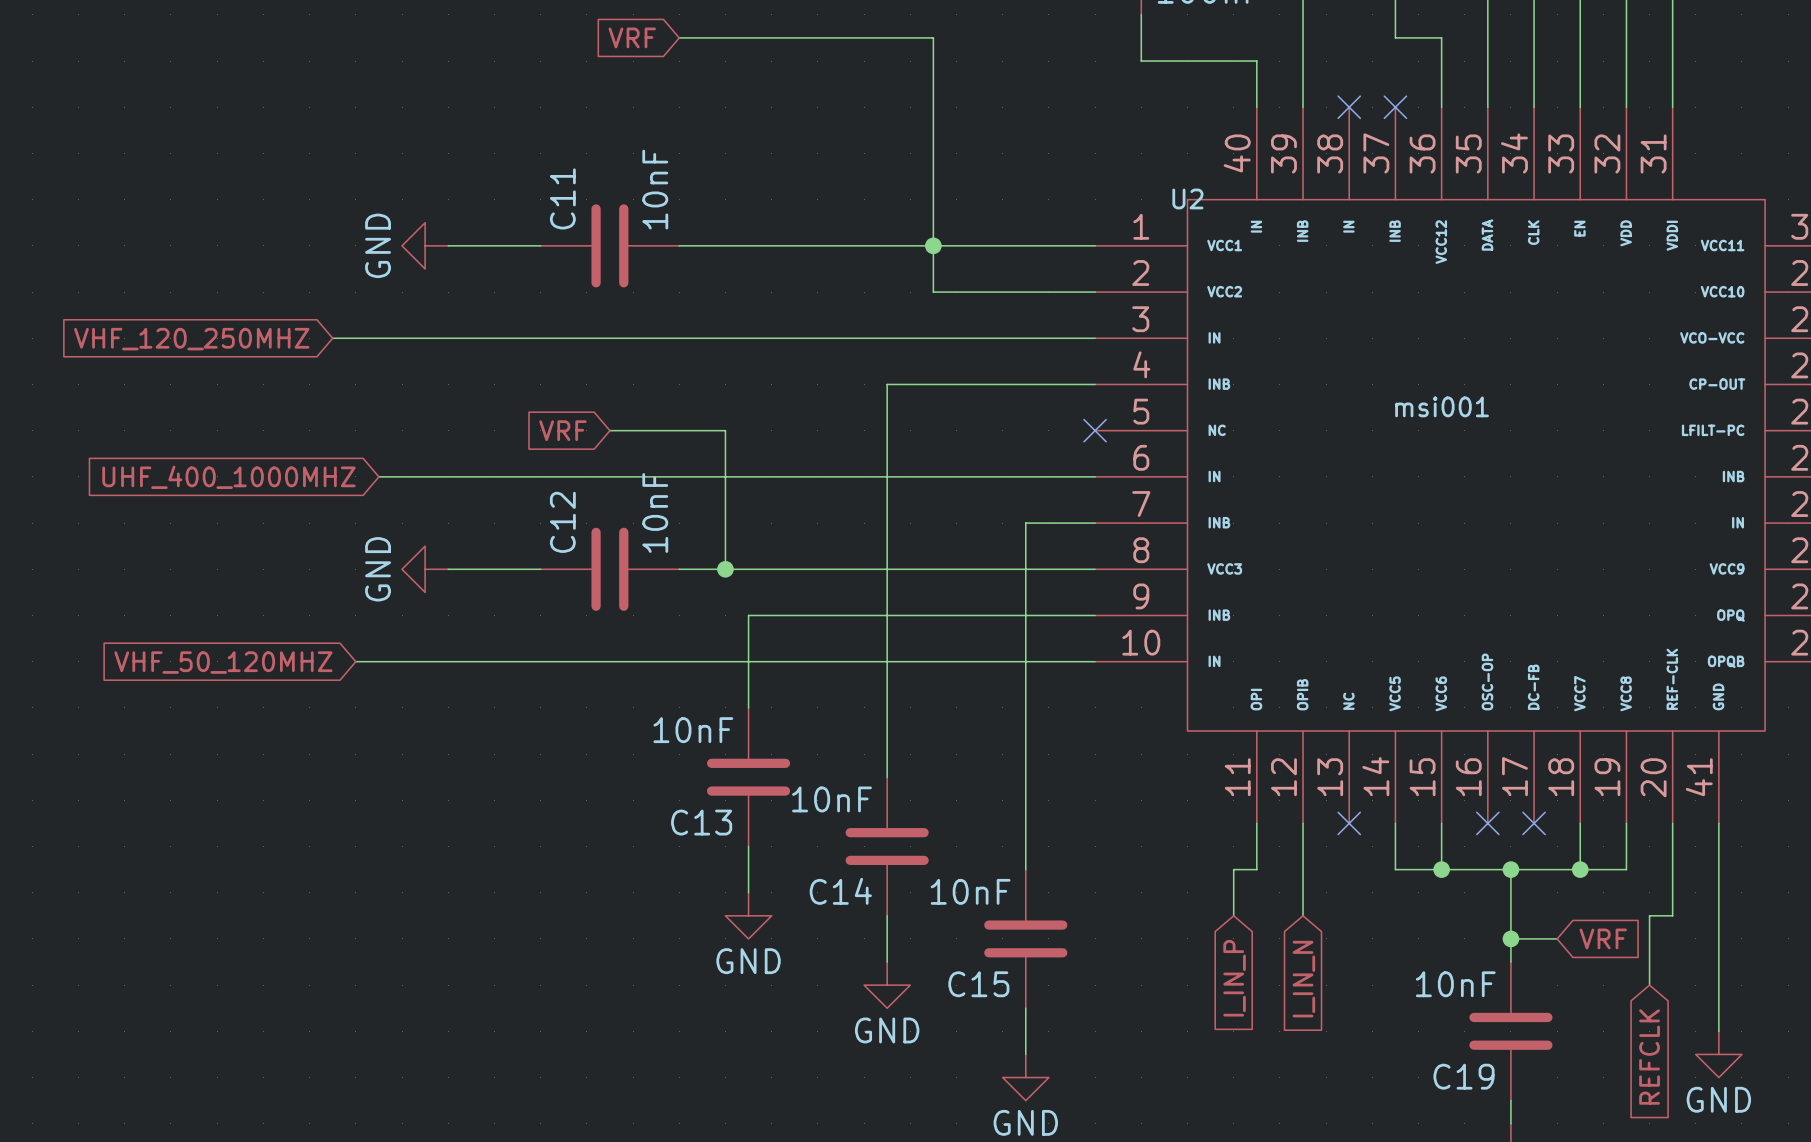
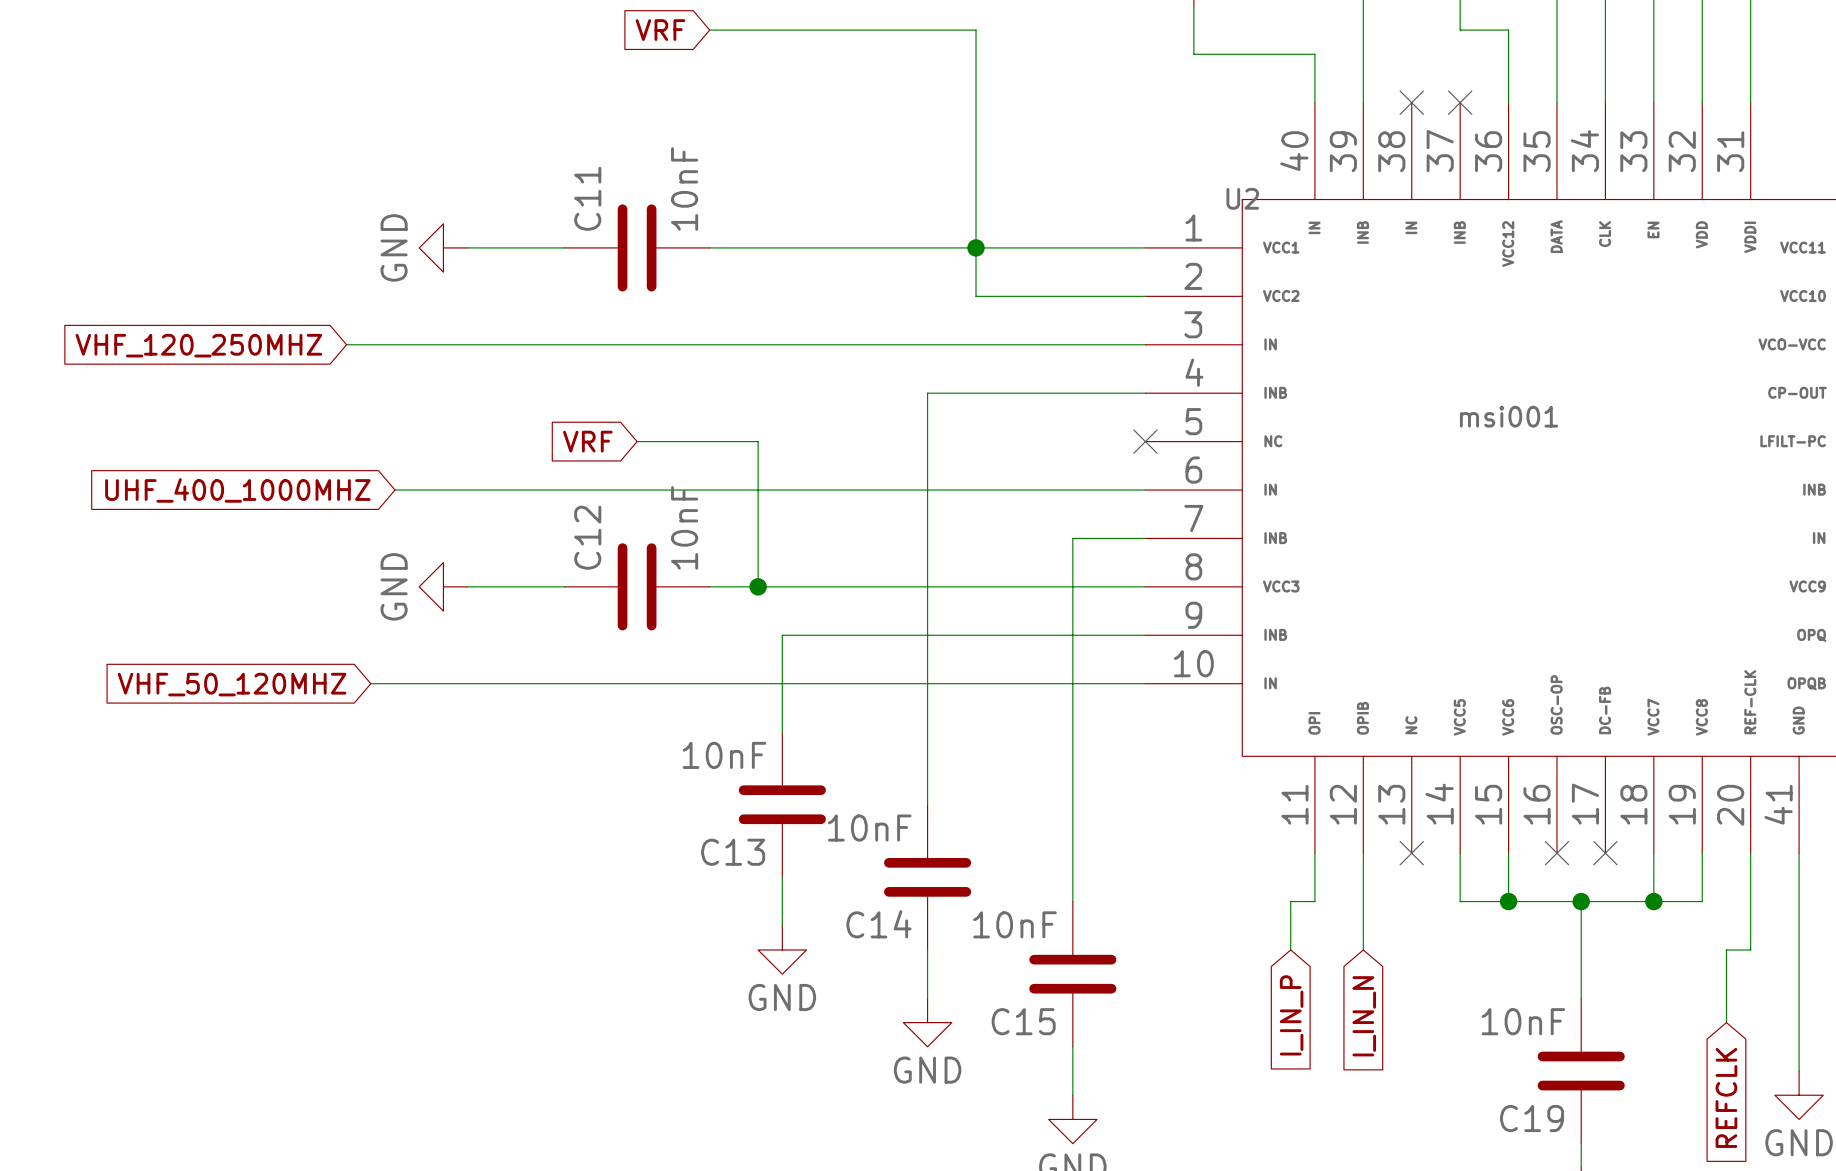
wire: (1510, 938) (1557, 938) -> none
junction: (1510, 938) -> none
global label: VRF (1603, 938) -> none

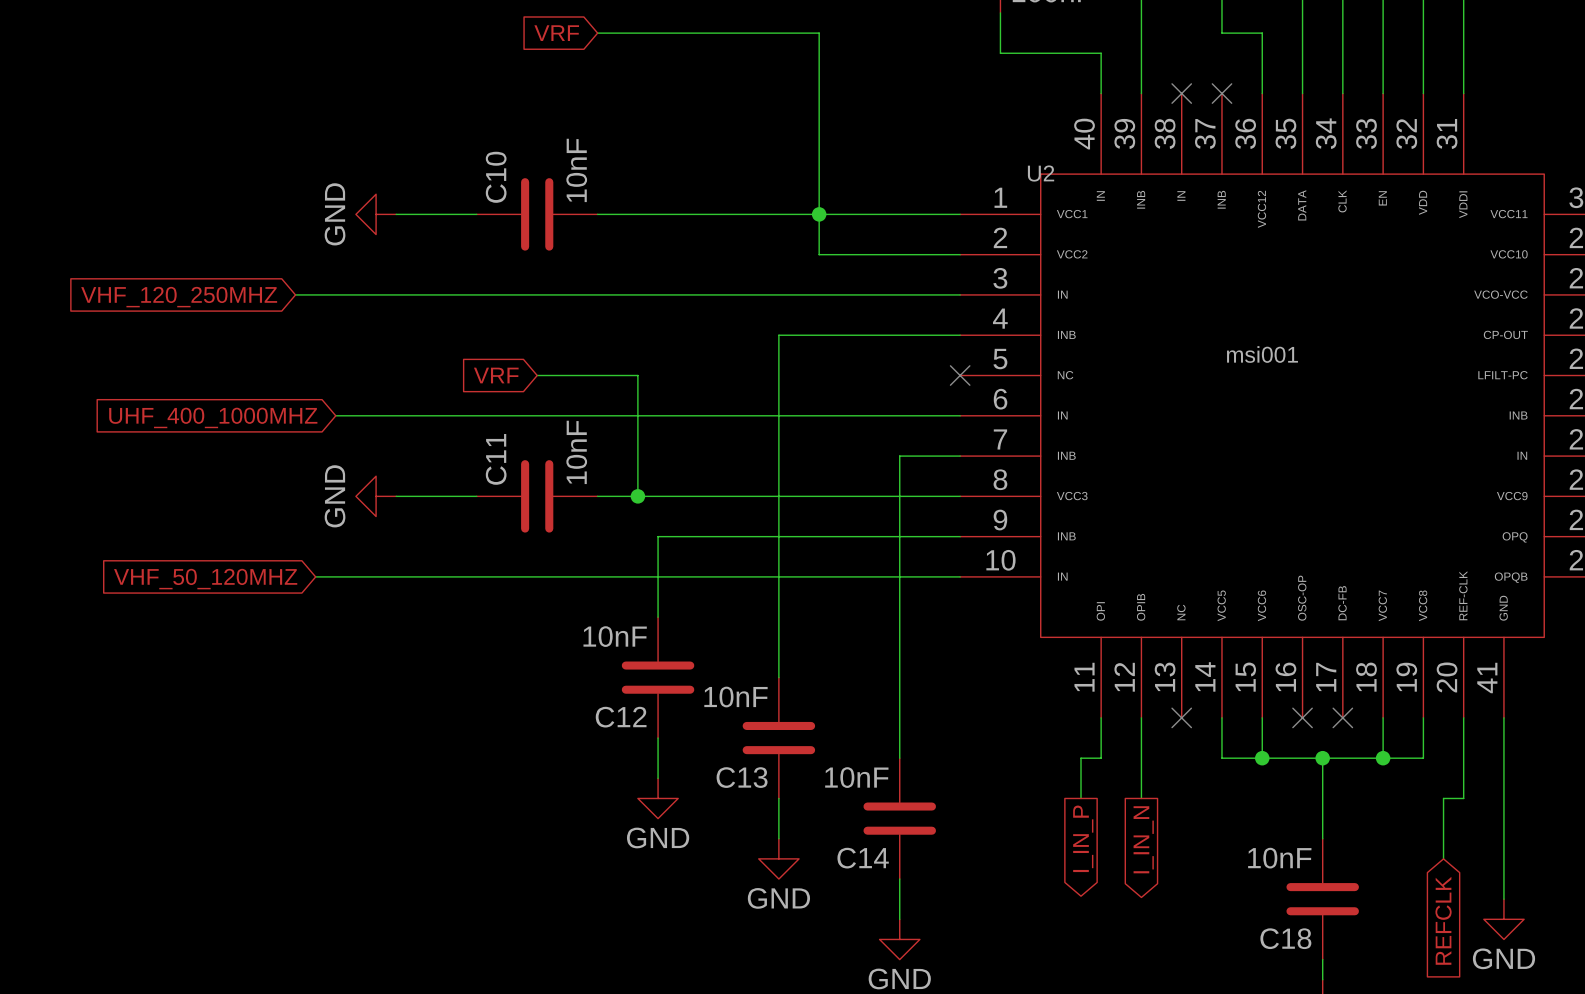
C11 name: C11 (587, 198) -> C10 (496, 177)
C12 name: C12 (587, 537) -> C11 (496, 459)
C13 name: C13 (733, 852) -> C12 (621, 717)
C14 name: C14 (878, 924) -> C13 (742, 777)
global label shape: input (1291, 1015) -> output (1083, 838)
global label shape: input (1364, 1016) -> output (1143, 839)
C15 name: C15 (1023, 1021) -> C14 (863, 858)
C19 name: C19 (1532, 1118) -> C18 (1285, 938)

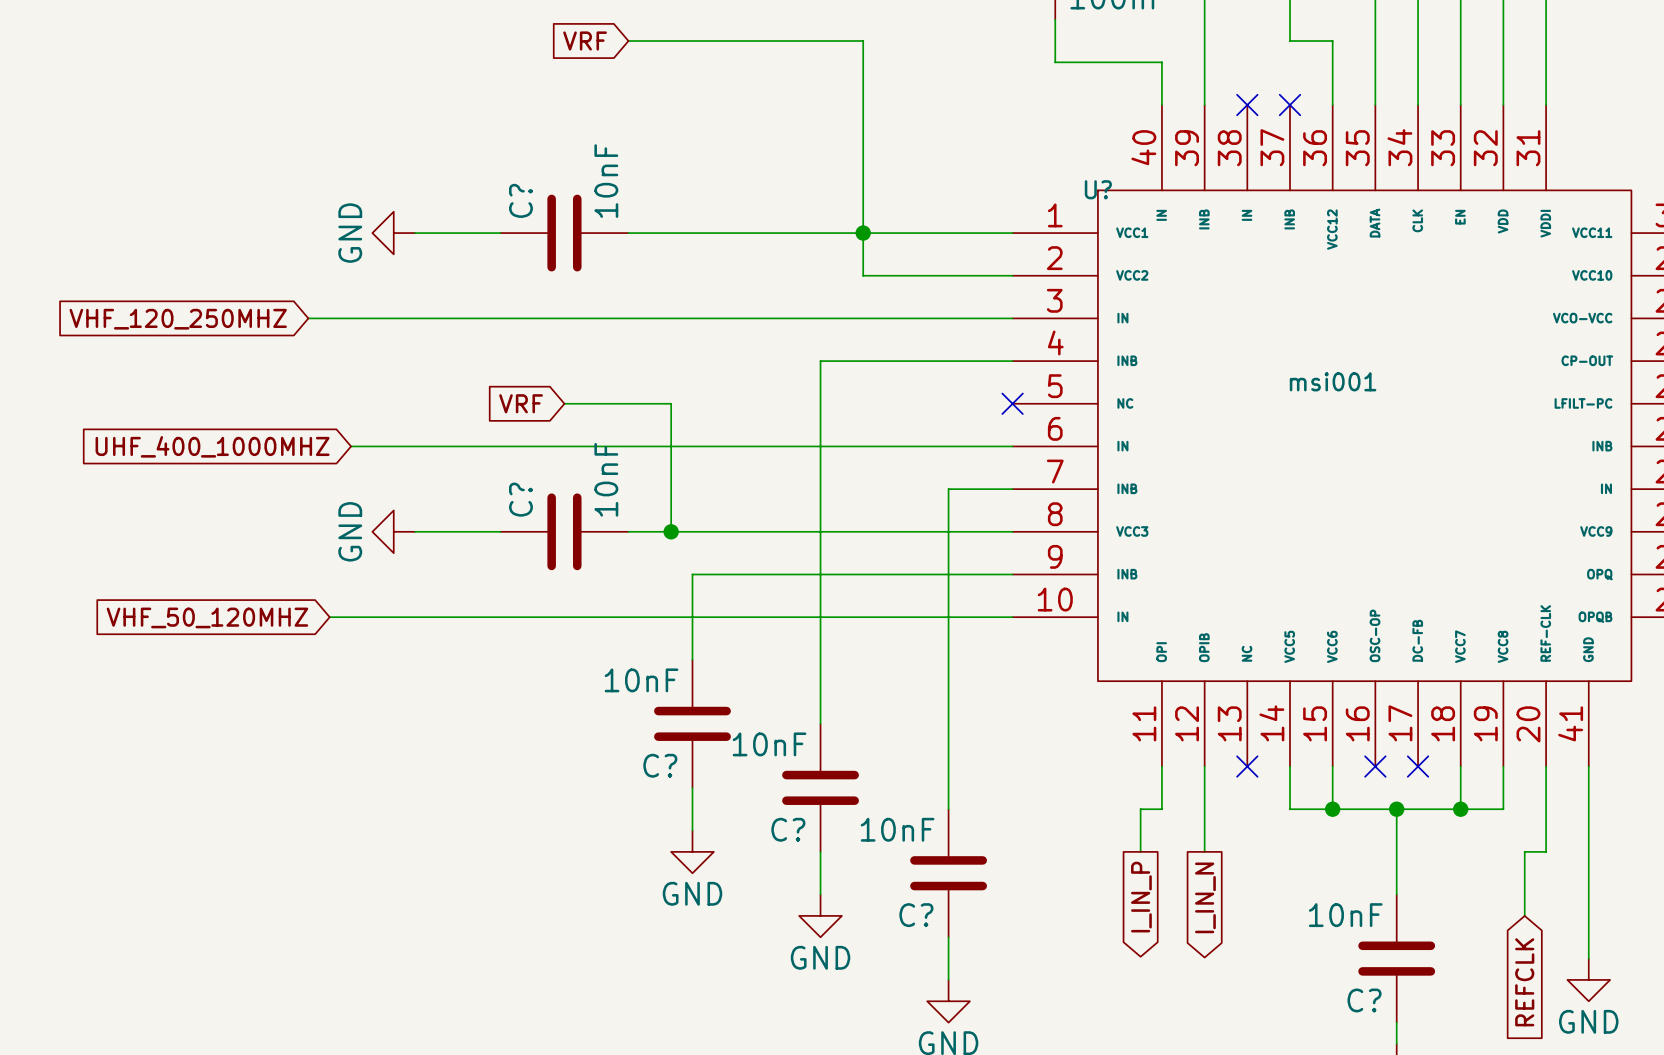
U2 name: U2 (1041, 173) -> U? (1098, 189)
C10 name: C10 (496, 177) -> C? (520, 200)
C11 name: C11 (496, 459) -> C? (520, 499)
C12 name: C12 (621, 717) -> C? (660, 765)
C13 name: C13 (742, 777) -> C? (788, 829)
C14 name: C14 (863, 858) -> C? (916, 915)
C18 name: C18 (1285, 938) -> C? (1364, 1000)

